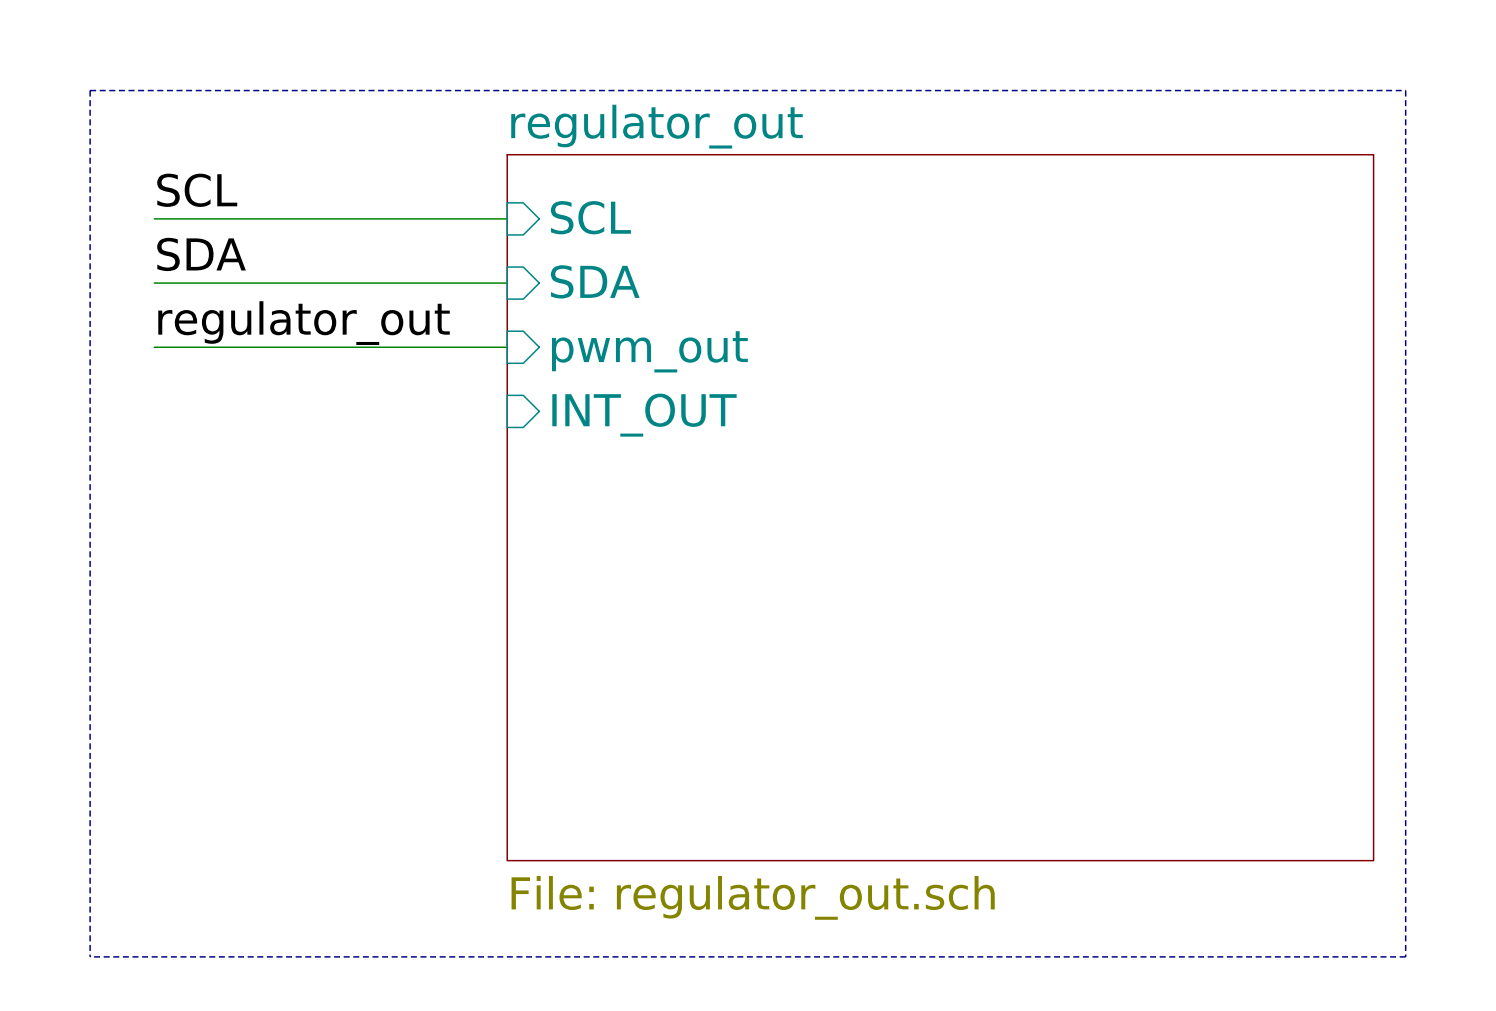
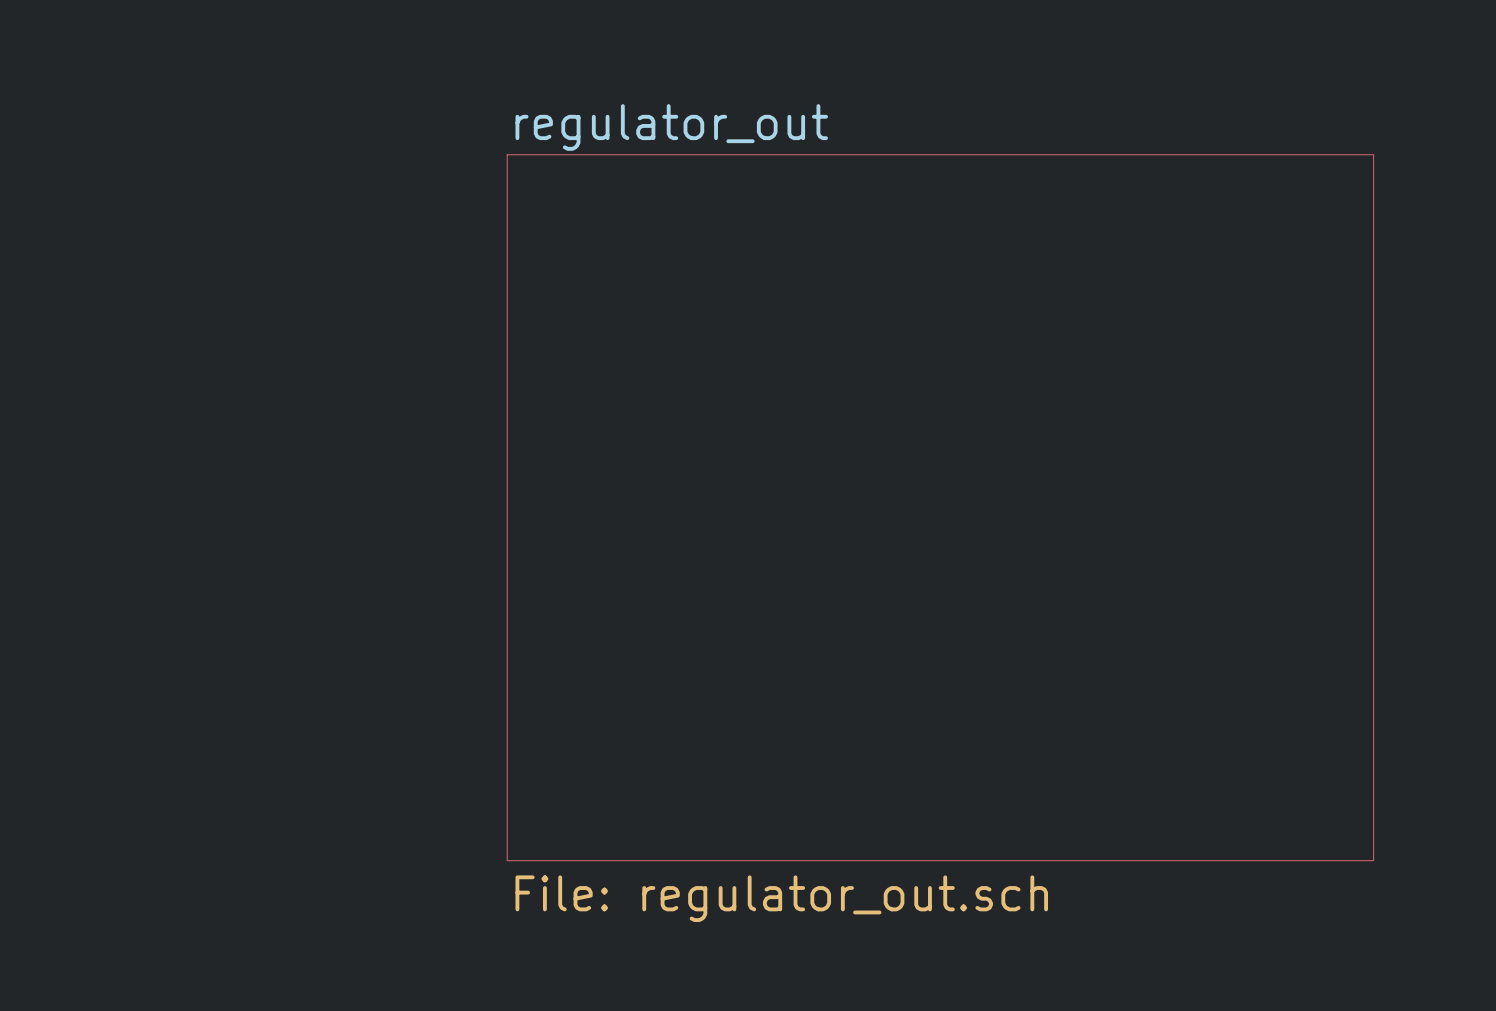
line: (90, 90) (1405, 90) (1405, 956) (90, 956) (90, 90) -> none
label: SCL (197, 190) -> none
sheet pin: SCL (590, 217) -> none
wire: (154, 218) (507, 218) -> none
label: SDA (201, 254) -> none
sheet pin: SDA (595, 281) -> none
wire: (154, 283) (507, 283) -> none
label: regulator_out (304, 323) -> none
wire: (154, 347) (507, 347) -> none
sheet pin: pwm_out (649, 351) -> none
sheet pin: INT_OUT (644, 415) -> none

